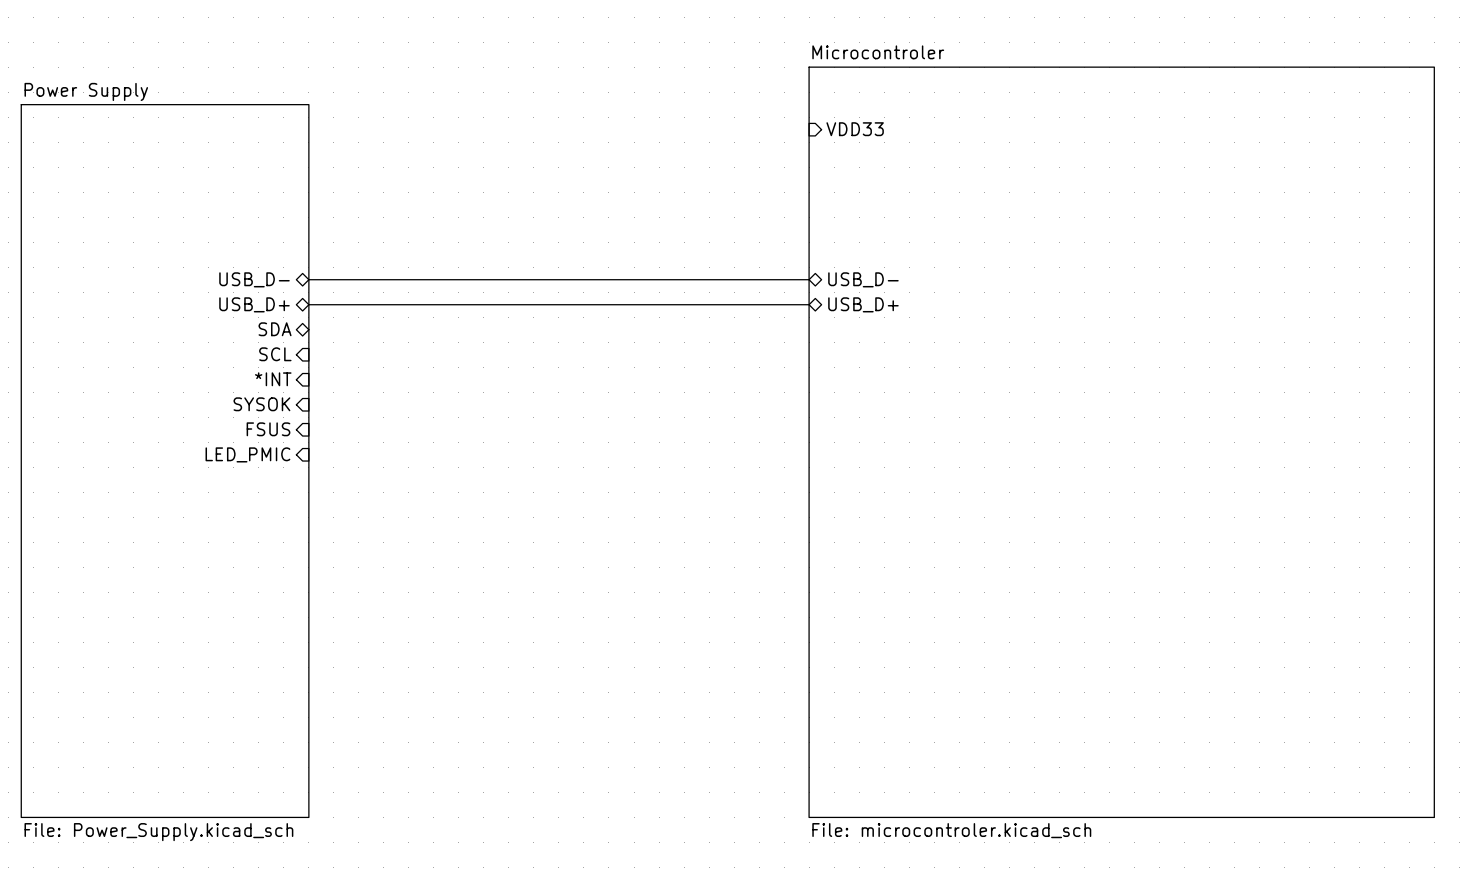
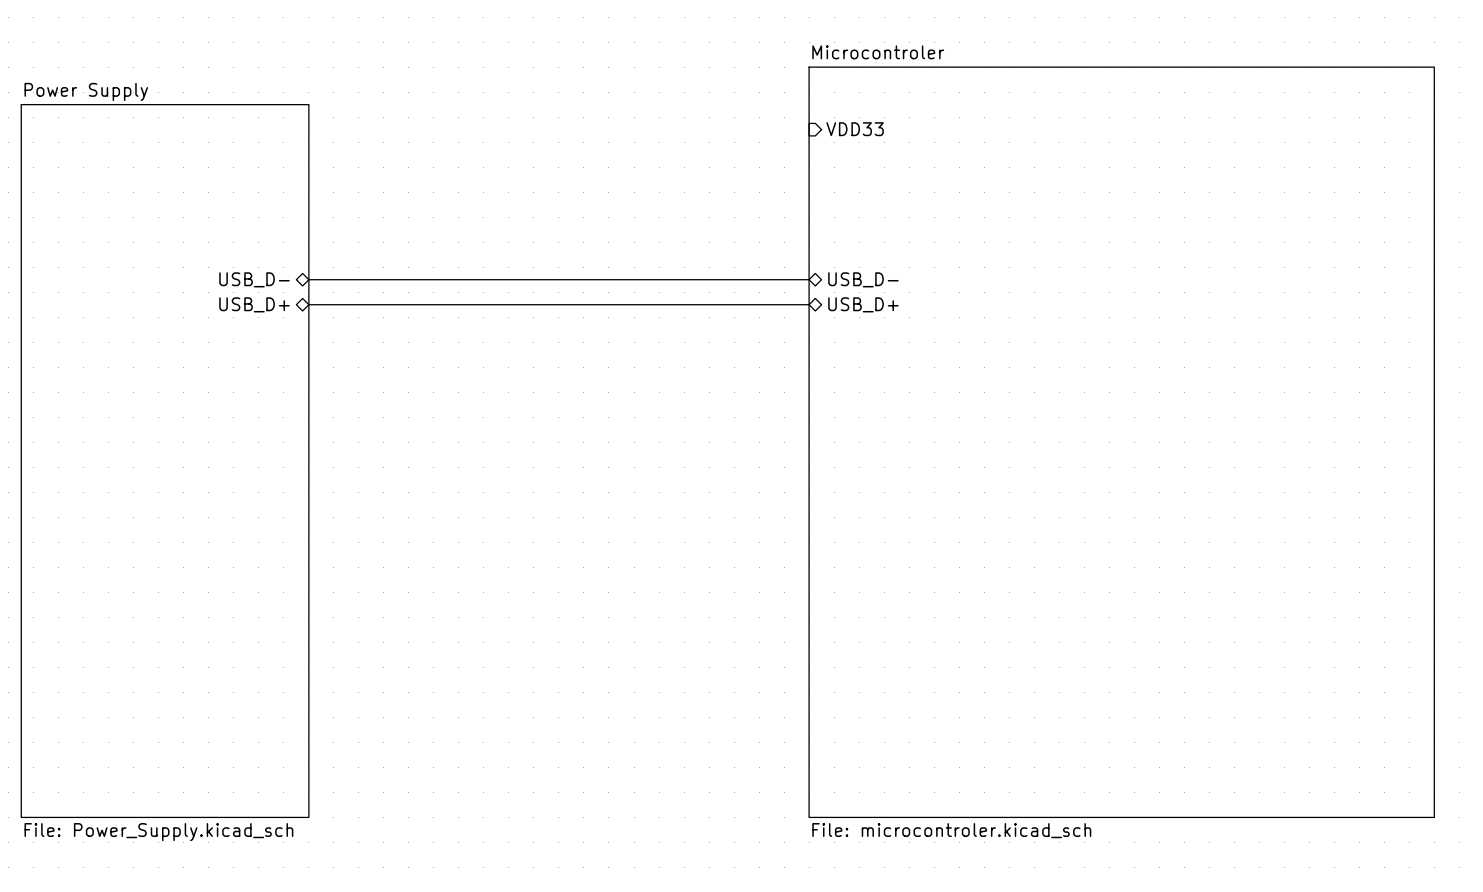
sheet pin: SDA (275, 329) -> none
sheet pin: SCL (275, 354) -> none
sheet pin: *INT (273, 379) -> none
sheet pin: SYSOK (261, 404) -> none
sheet pin: FSUS (268, 429) -> none
sheet pin: LED_PMIC (247, 454) -> none

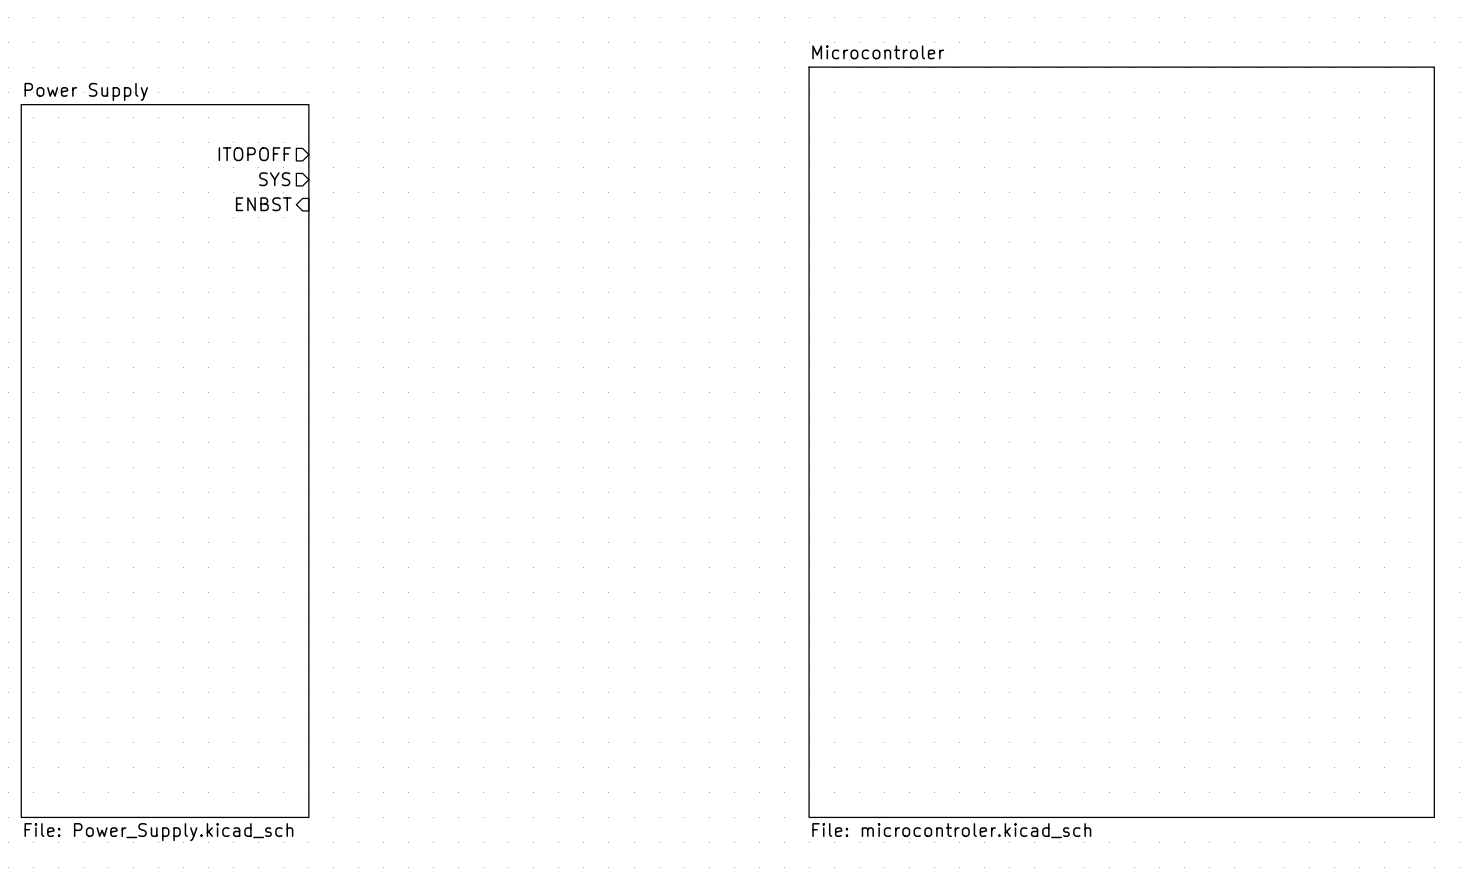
sheet pin: VDD33 (855, 129) -> none
sheet pin: none -> ITOPOFF (254, 154)
sheet pin: none -> SYS (274, 179)
sheet pin: none -> ENBST (263, 204)
sheet pin: USB_D- (254, 279) -> none
wire: (308, 279) (809, 279) -> none
sheet pin: USB_D- (863, 279) -> none
sheet pin: USB_D+ (254, 304) -> none
wire: (308, 304) (809, 304) -> none
sheet pin: USB_D+ (863, 304) -> none

